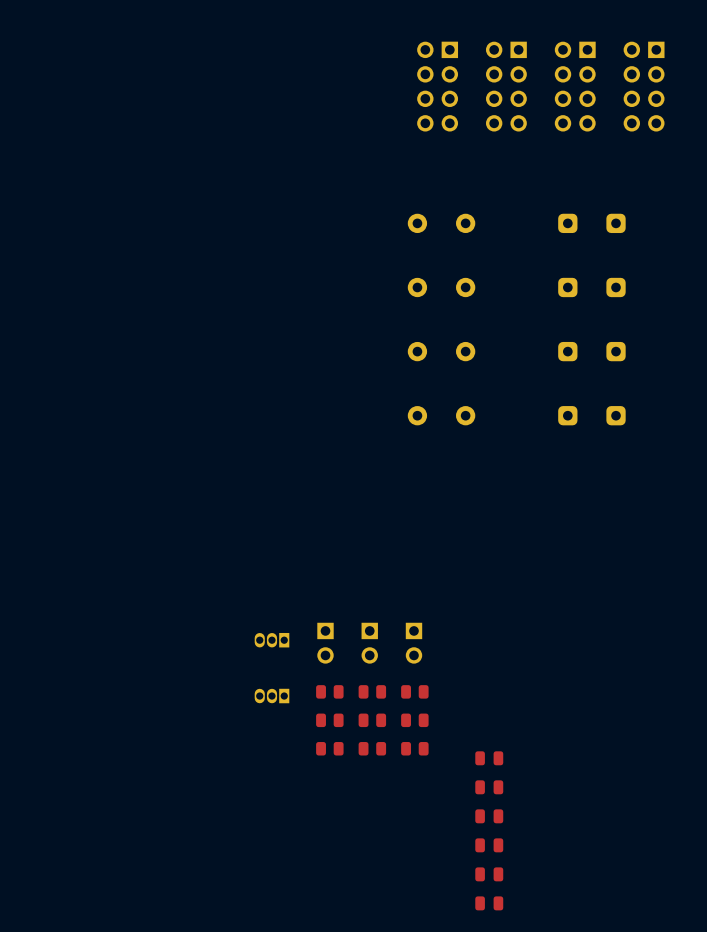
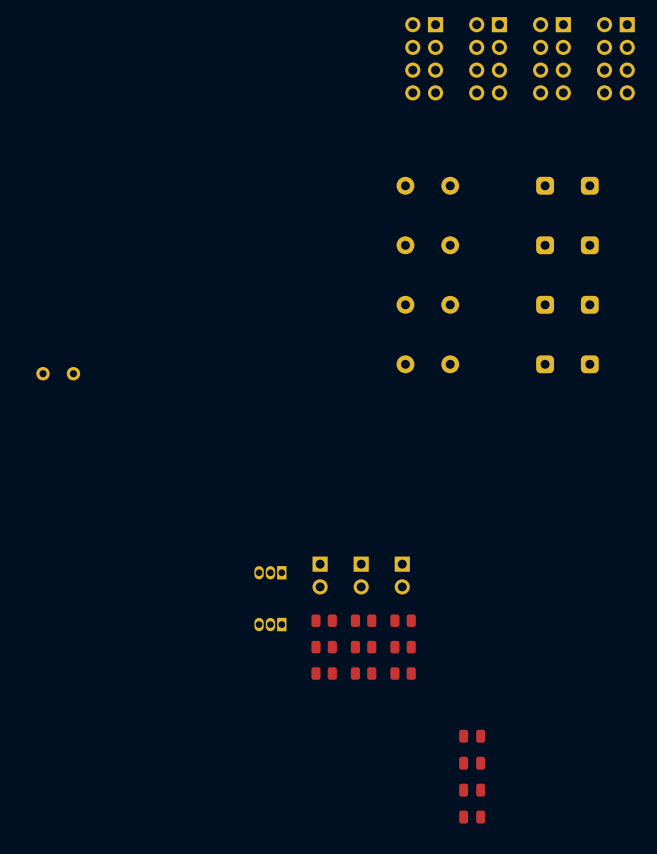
part: none -> (58, 373)
part: (489, 758) -> none
part: (489, 787) -> none

